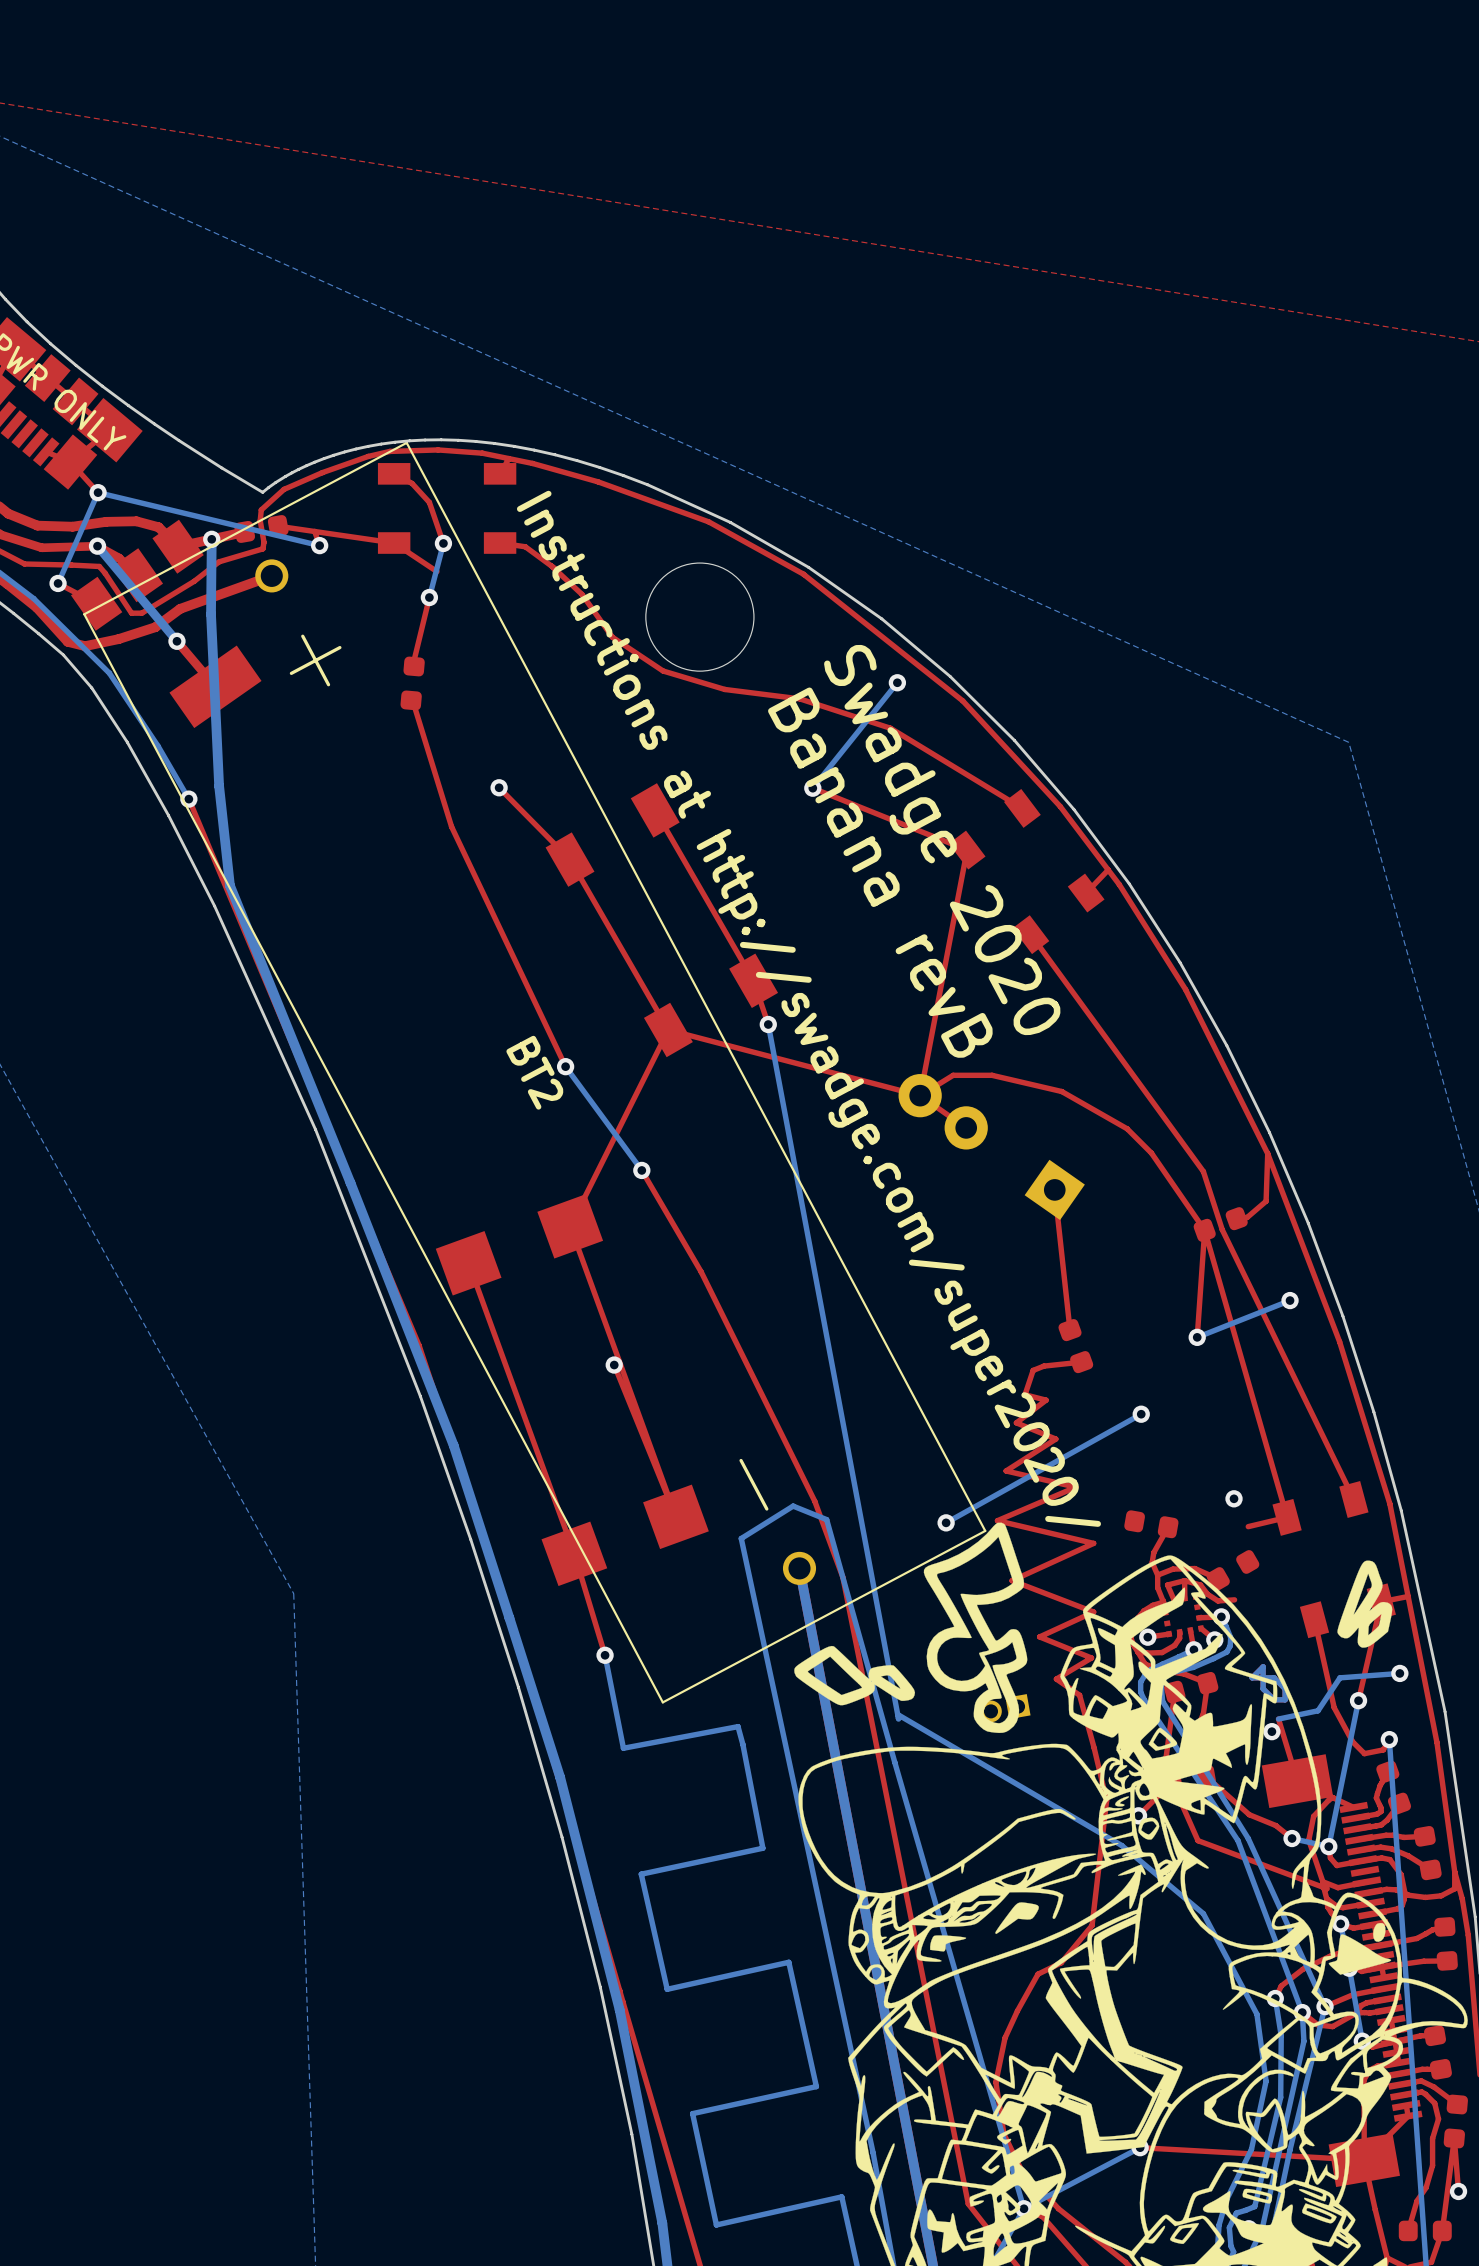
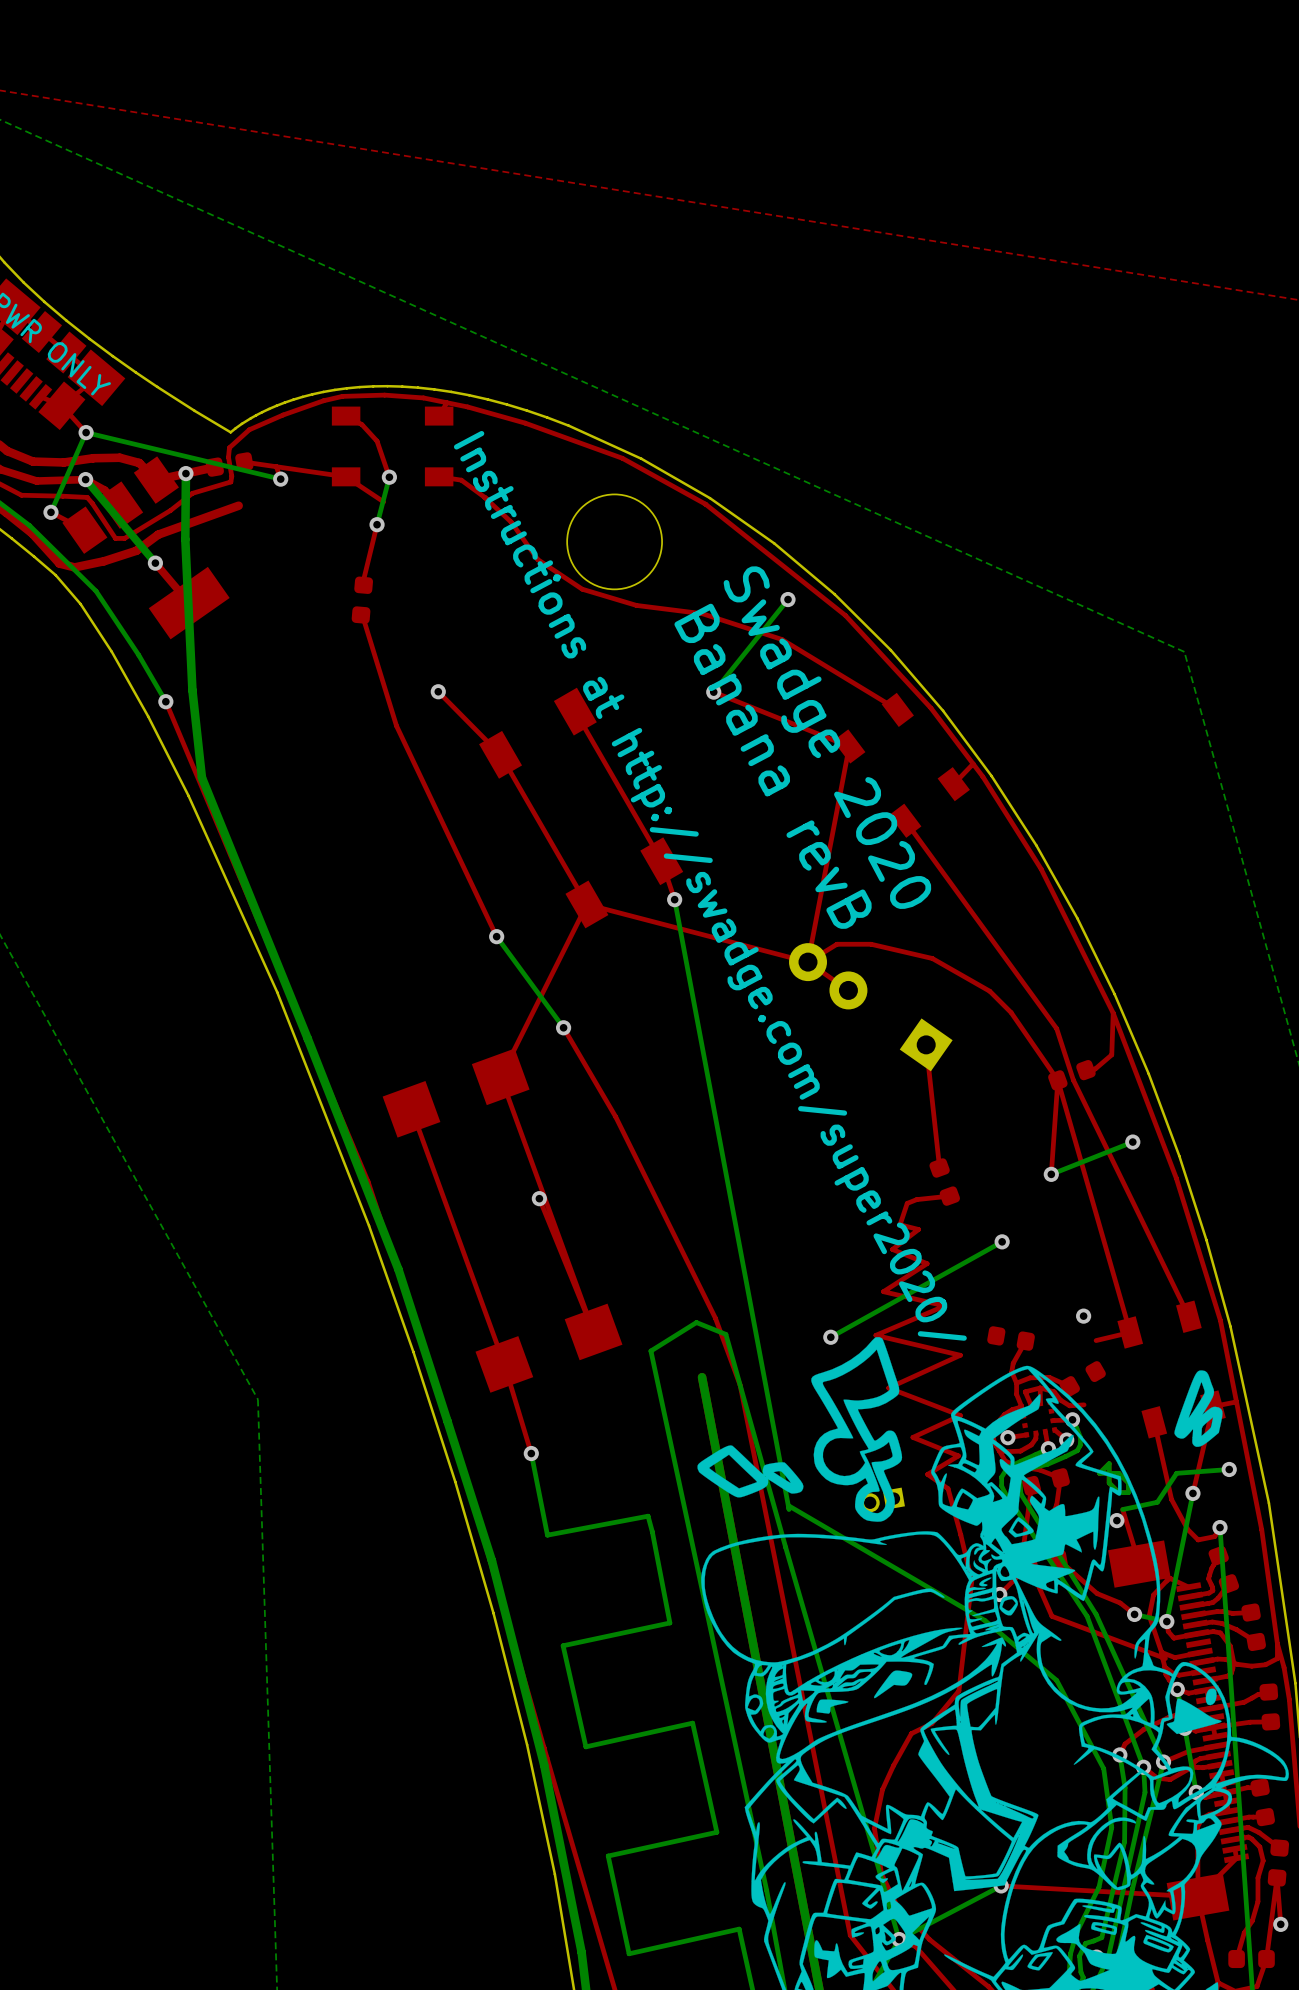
BT2: (534, 1072) -> none

